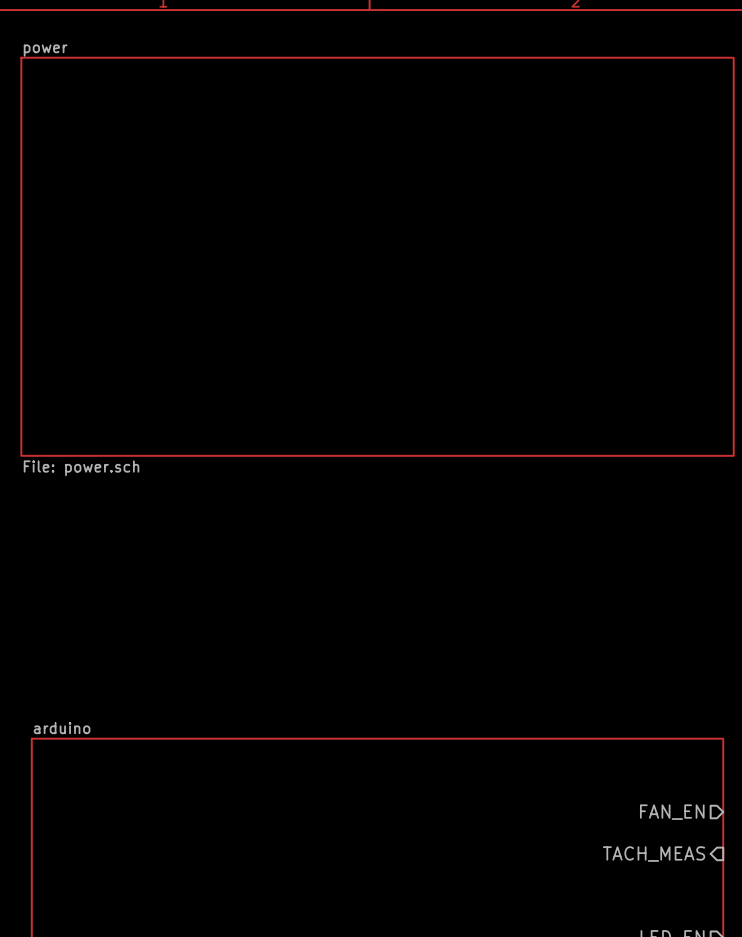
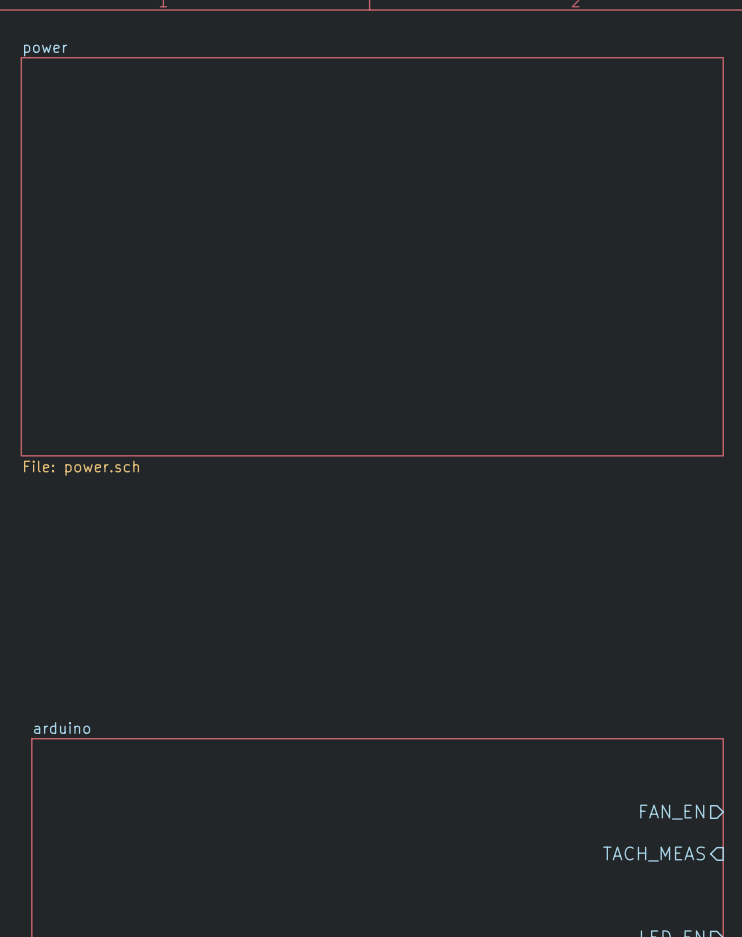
sheet power shape: [21, 57, 734, 456] -> [21, 57, 724, 456]

